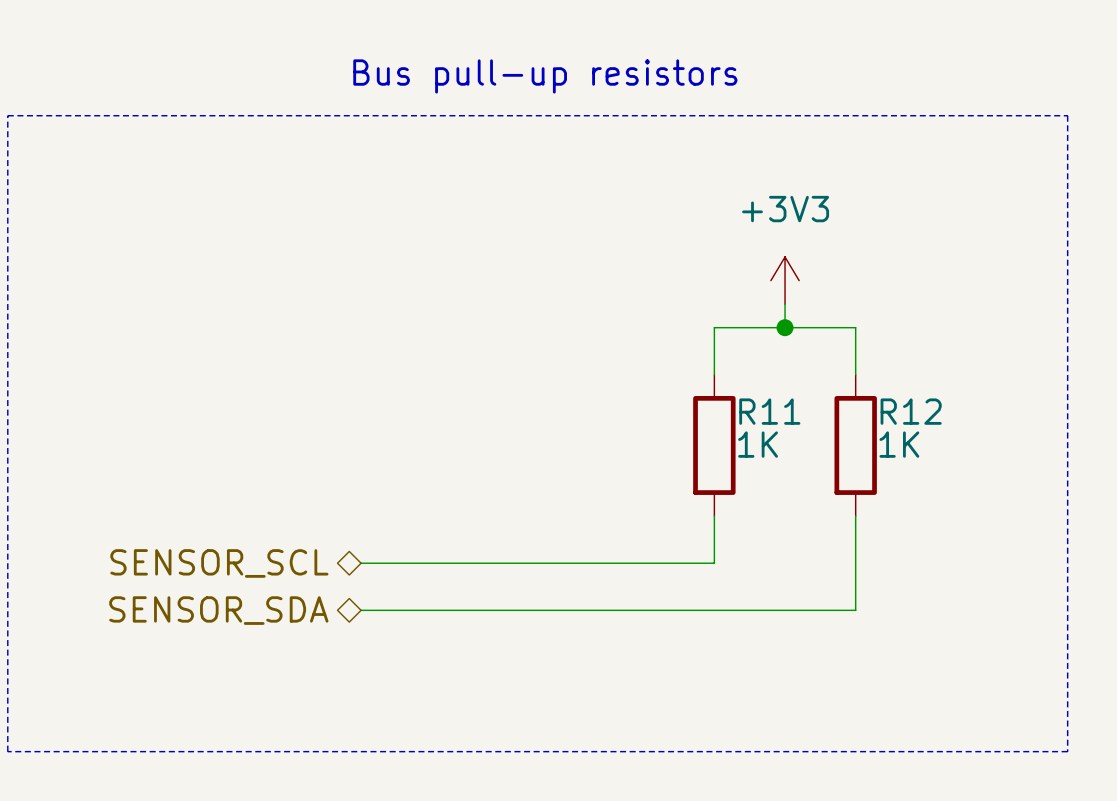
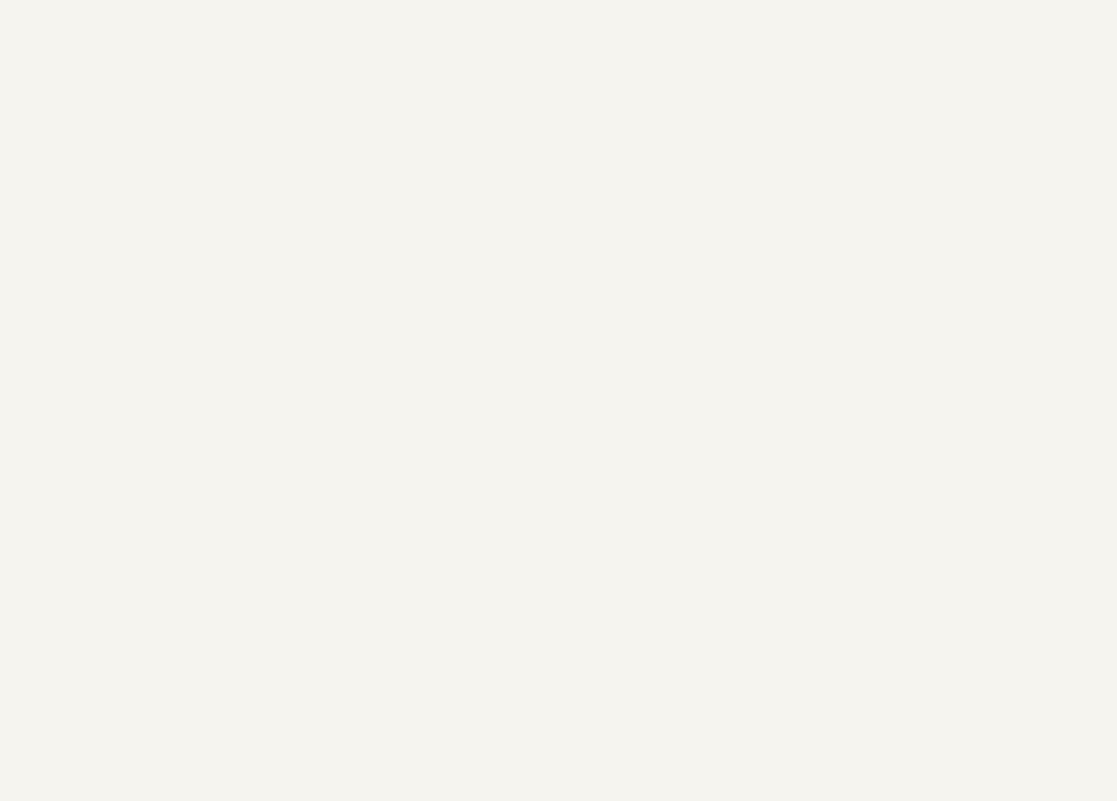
text: Bus pull-up resistors (545, 76) -> none
line: (7, 115) (1067, 115) (1067, 751) (7, 751) (7, 115) -> none
power symbol: +3V3 (785, 280) -> none
wire: (785, 304) (785, 327) -> none
junction: (785, 327) -> none
wire: (714, 374) (714, 327) (855, 327) (855, 374) -> none
R11: 1K (714, 445) -> none
R12: 1K (855, 445) -> none
wire: (714, 516) (714, 563) (361, 563) -> none
wire: (855, 516) (855, 610) (361, 610) -> none
hierarchical label: SENSOR_SCL (219, 563) -> none
hierarchical label: SENSOR_SDA (218, 610) -> none

